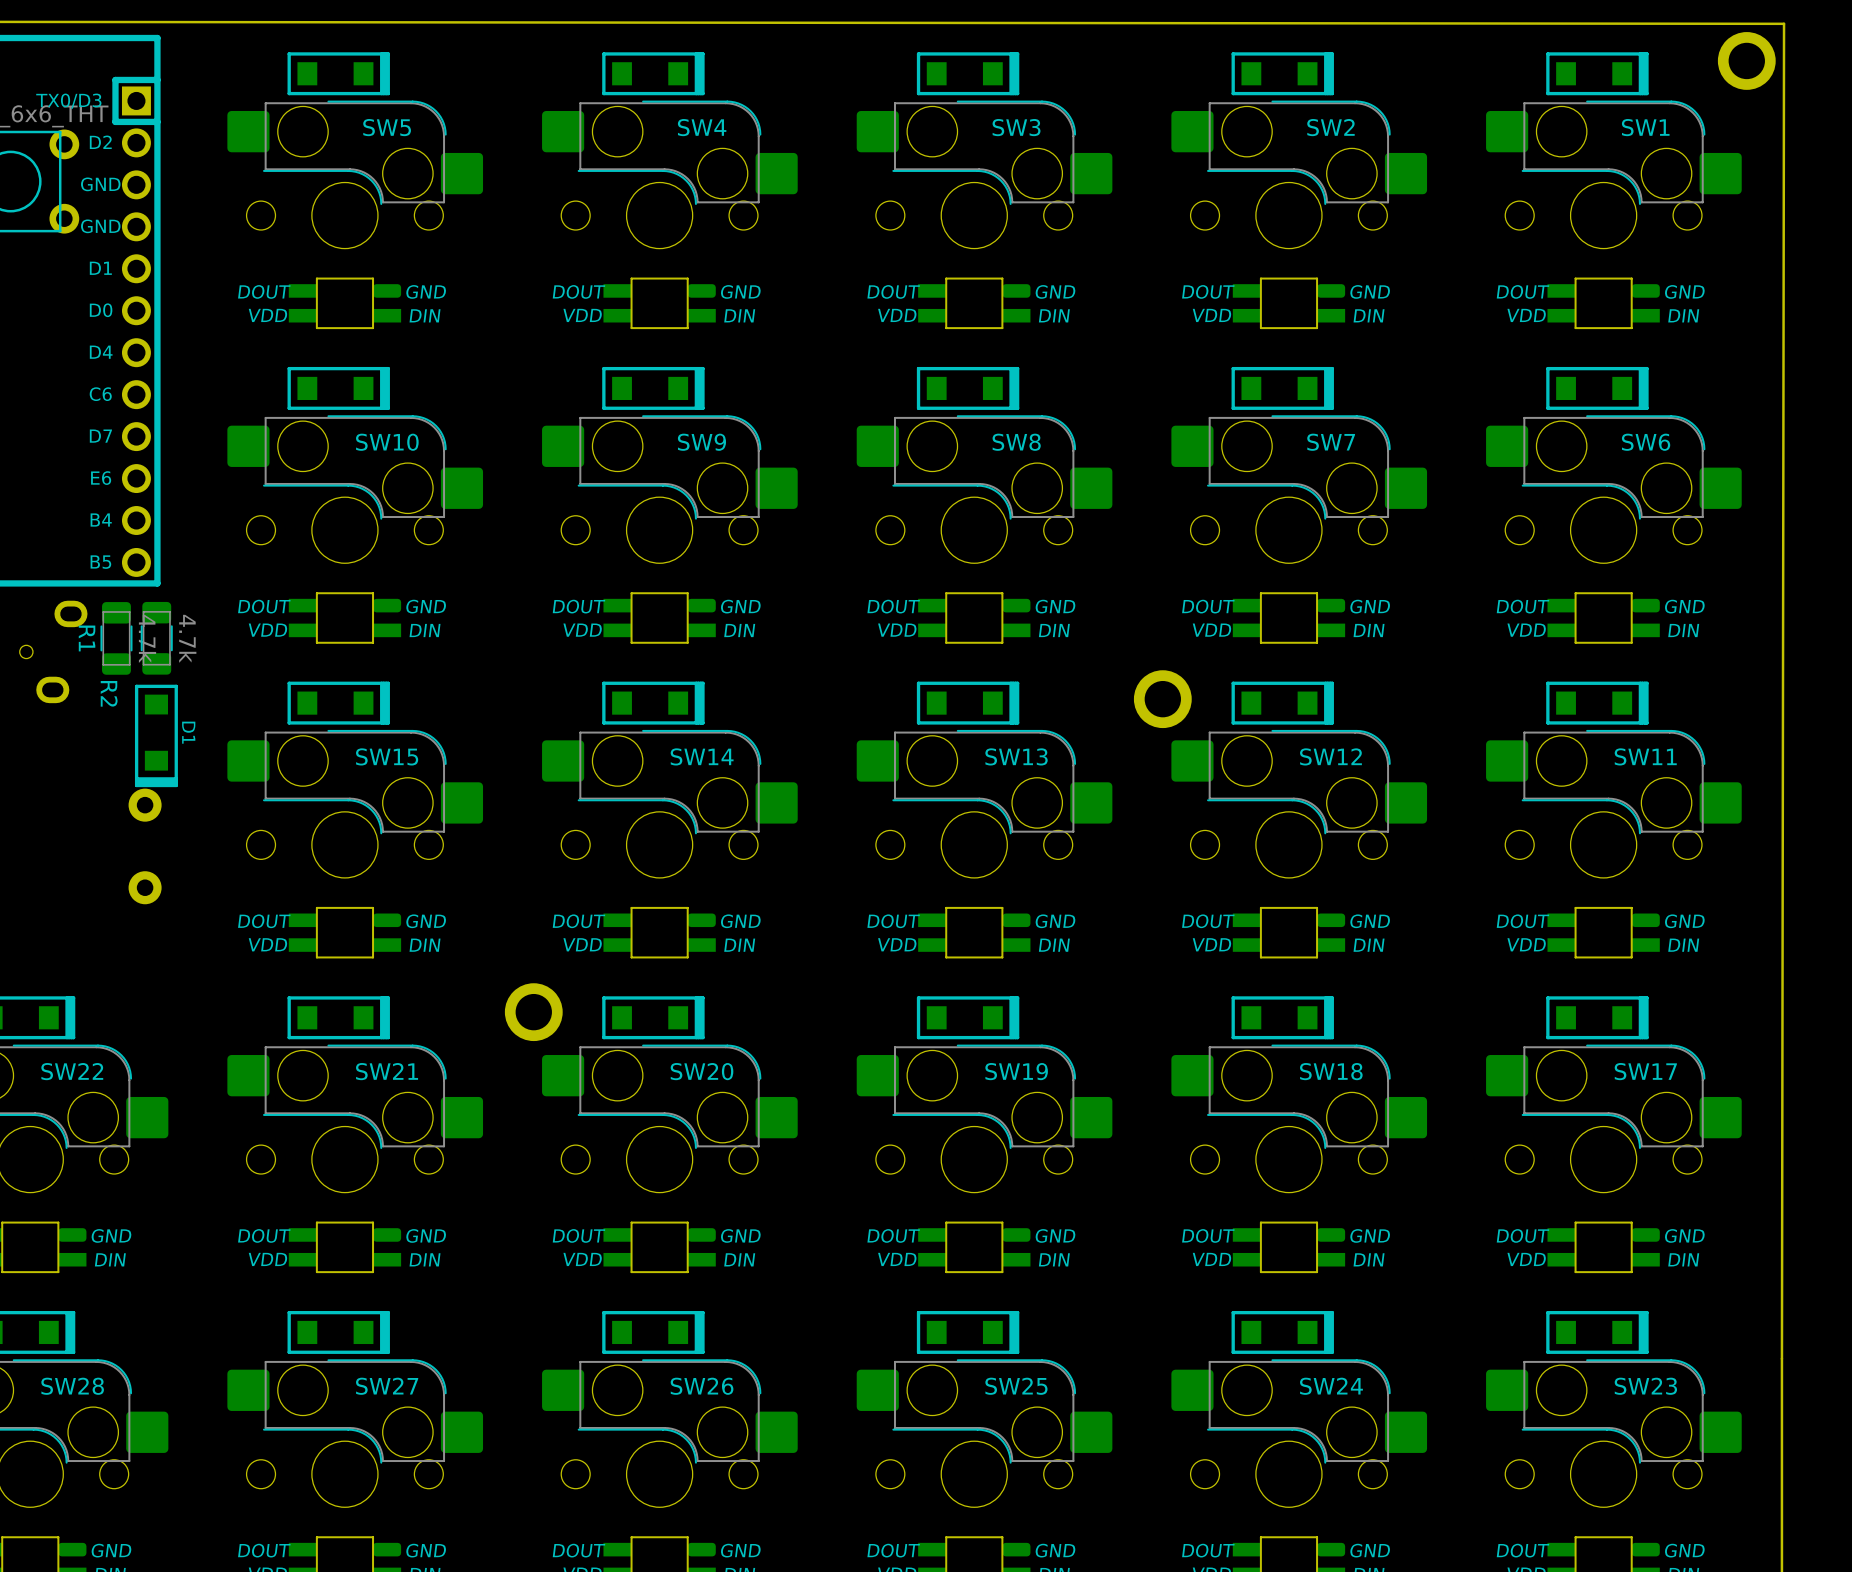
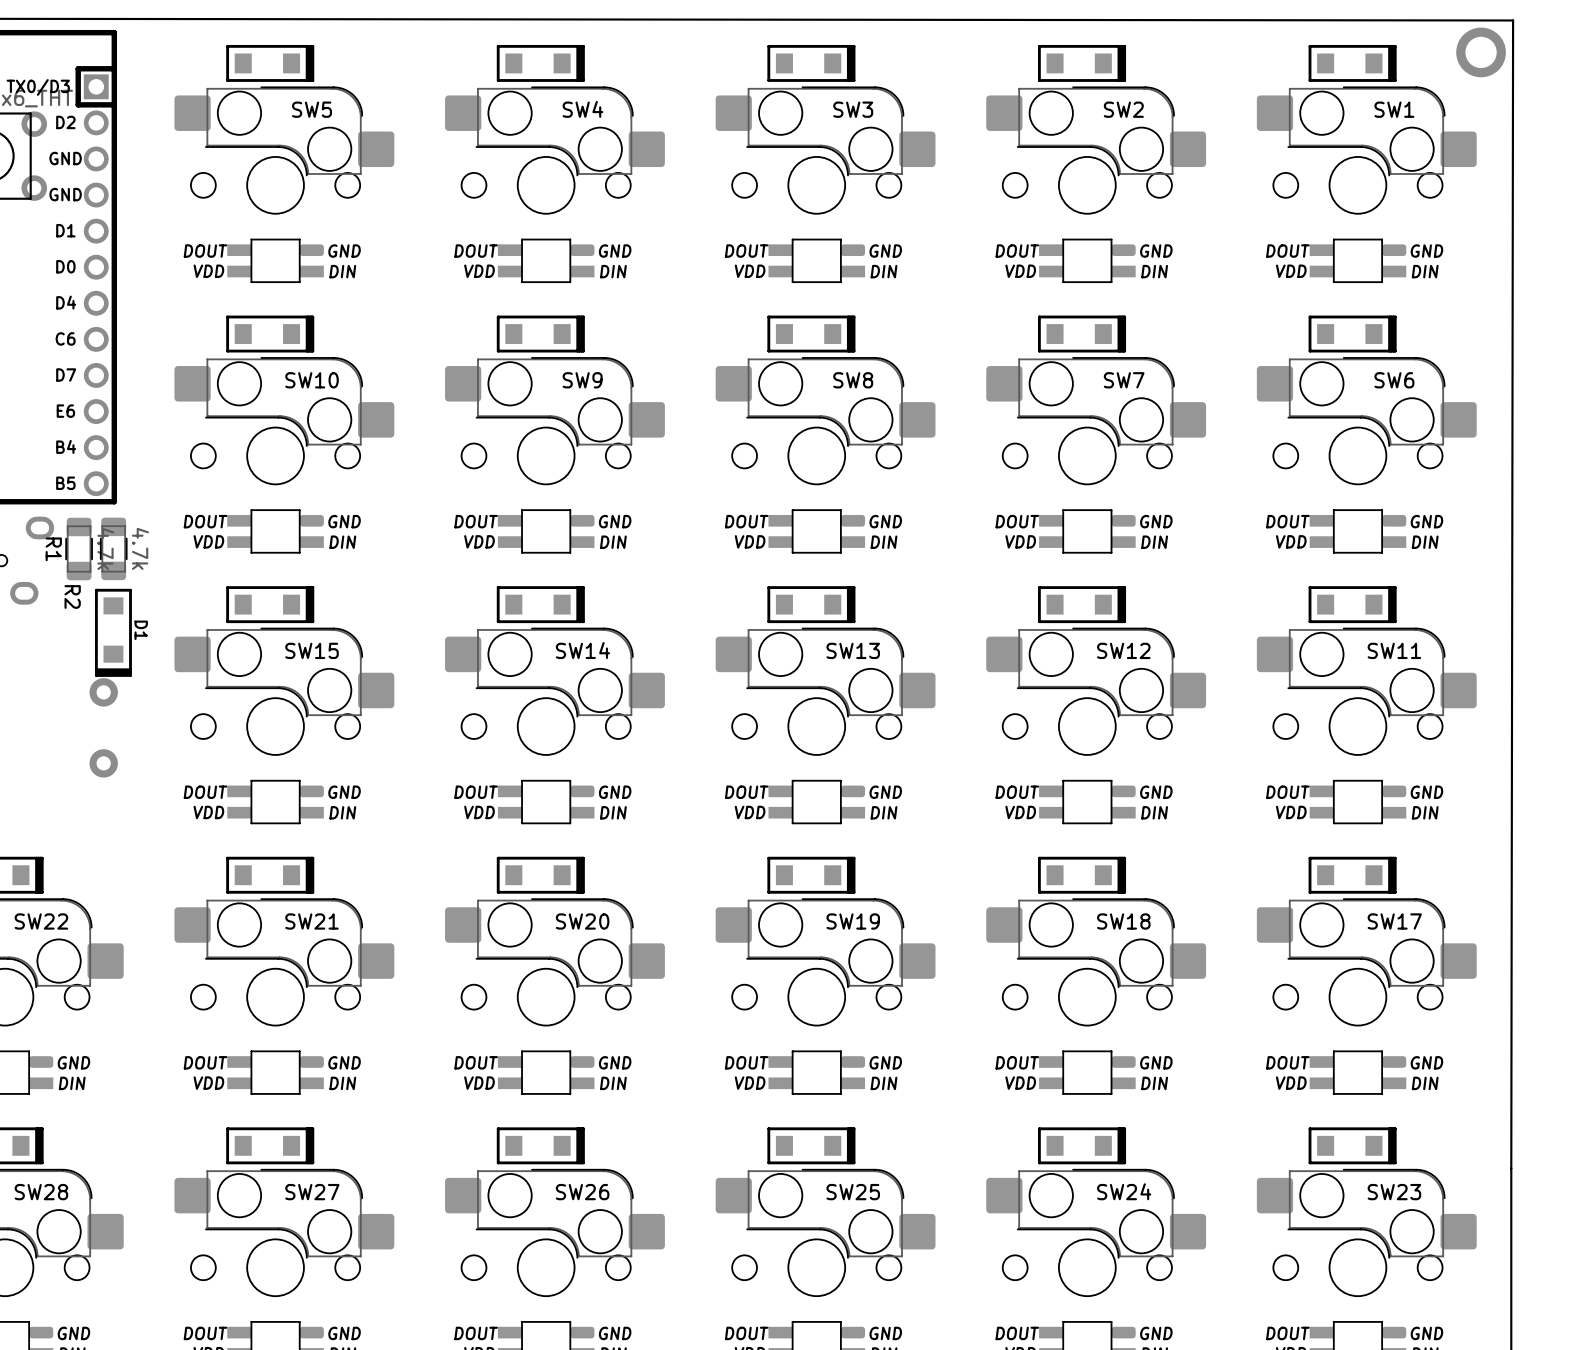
part: (1162, 699) -> none
part: (533, 1012) -> none

